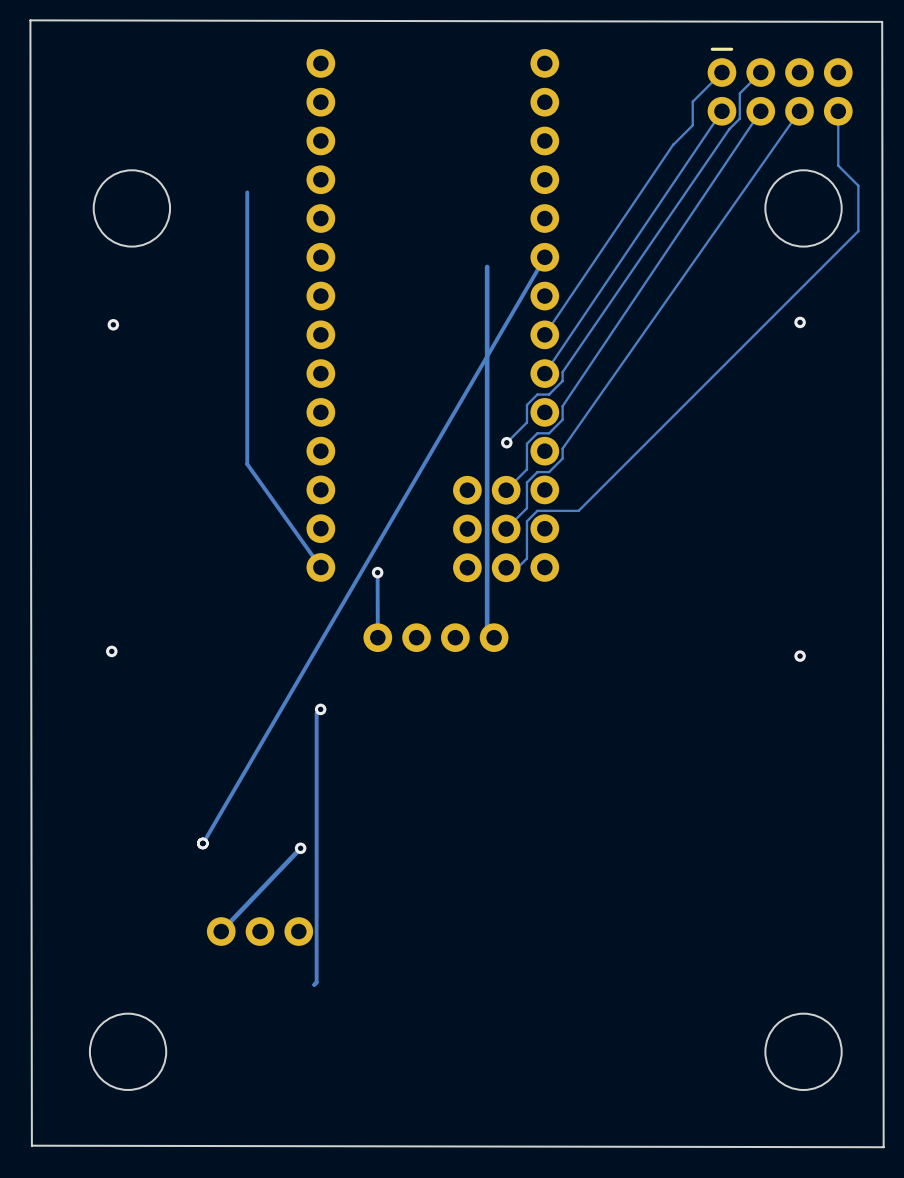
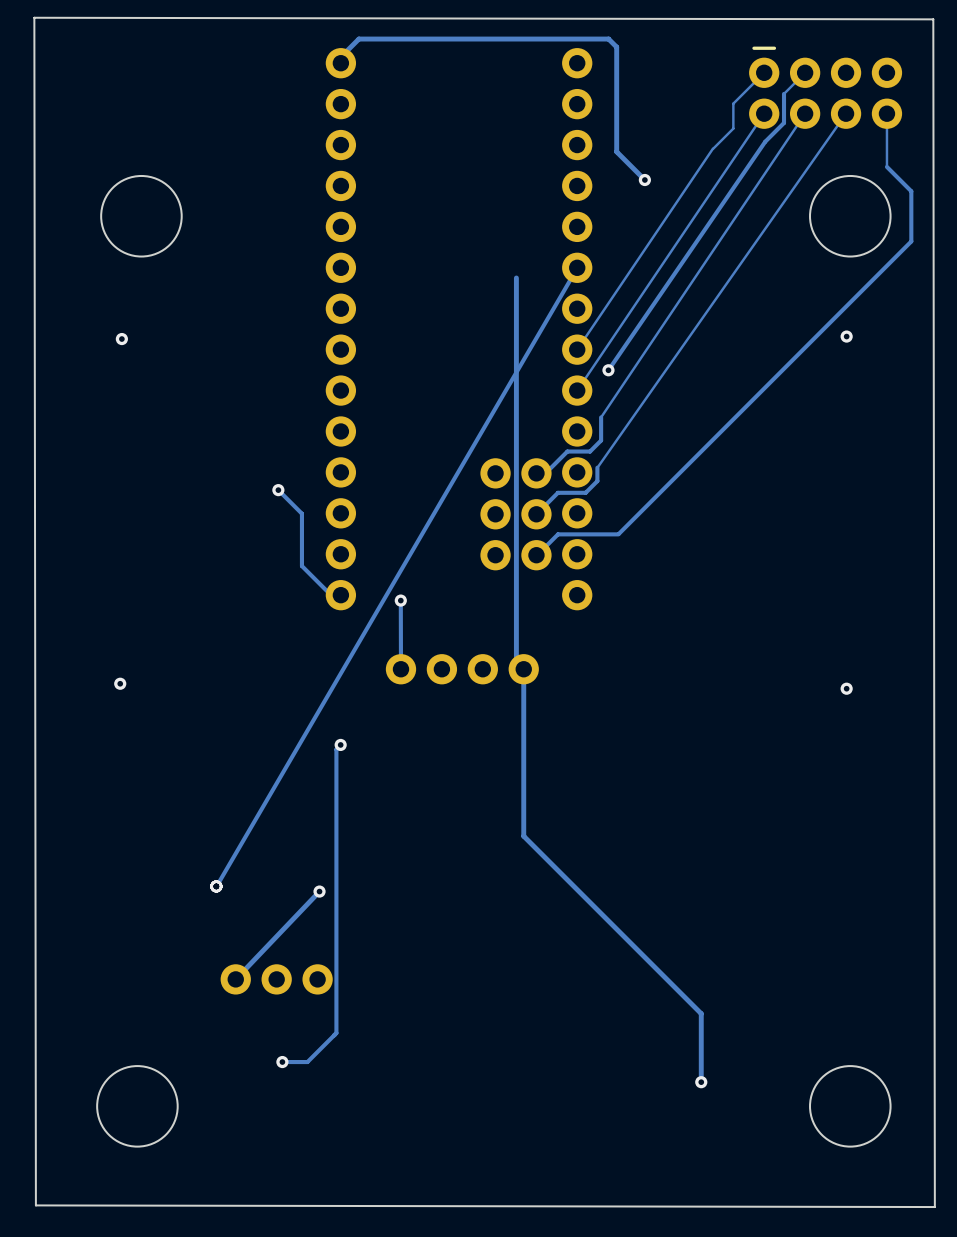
track: none -> (340, 63) (340, 57) (358, 39) (608, 39) (616, 47) (616, 151) (644, 180)
track: (740, 92) (739, 118) (729, 129) (562, 372) (562, 380) (549, 394) (537, 394) (526, 404) (526, 422) (506, 442) -> (784, 93) (784, 122) (765, 141) (608, 370)
track: (838, 161) (838, 165) (858, 185) (858, 231) (578, 510) (537, 510) (526, 521) (526, 558) (511, 574) -> (886, 166) (911, 191) (911, 241) (618, 534) (558, 534) (538, 553) (532, 553)
via: none -> (644, 180)
track: (247, 192) (247, 464) (320, 567) -> none
via: none -> (608, 370)
track: (567, 399) (562, 406) (562, 419) (549, 433) (537, 433) (526, 443) (526, 469) (506, 490) -> (601, 417) (601, 440) (590, 451) (567, 451) (545, 473) (536, 473)
via: (506, 442) -> none
track: (564, 446) (562, 458) (549, 472) (537, 472) (526, 482) (526, 508) (506, 529) -> (597, 467) (597, 481) (585, 492) (557, 492) (536, 514)
track: none -> (278, 490) (301, 513) (301, 566) (330, 594)
via: none -> (278, 490)
part position: (486, 529) -> (516, 514)
track: none -> (523, 669) (523, 836) (701, 1013) (701, 1082)
track: none -> (335, 1034) (307, 1062) (282, 1062)
via: none -> (282, 1062)
via: none -> (701, 1082)

